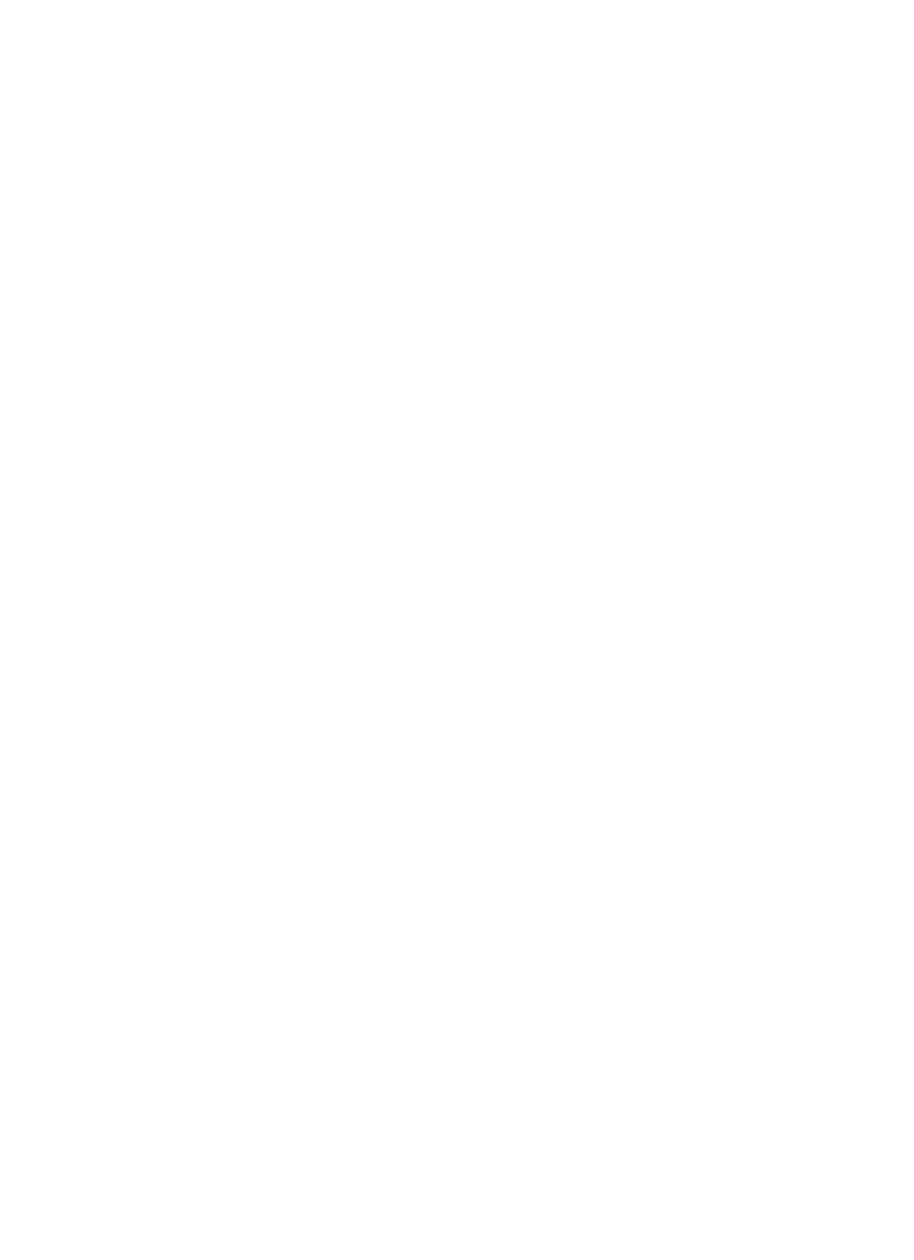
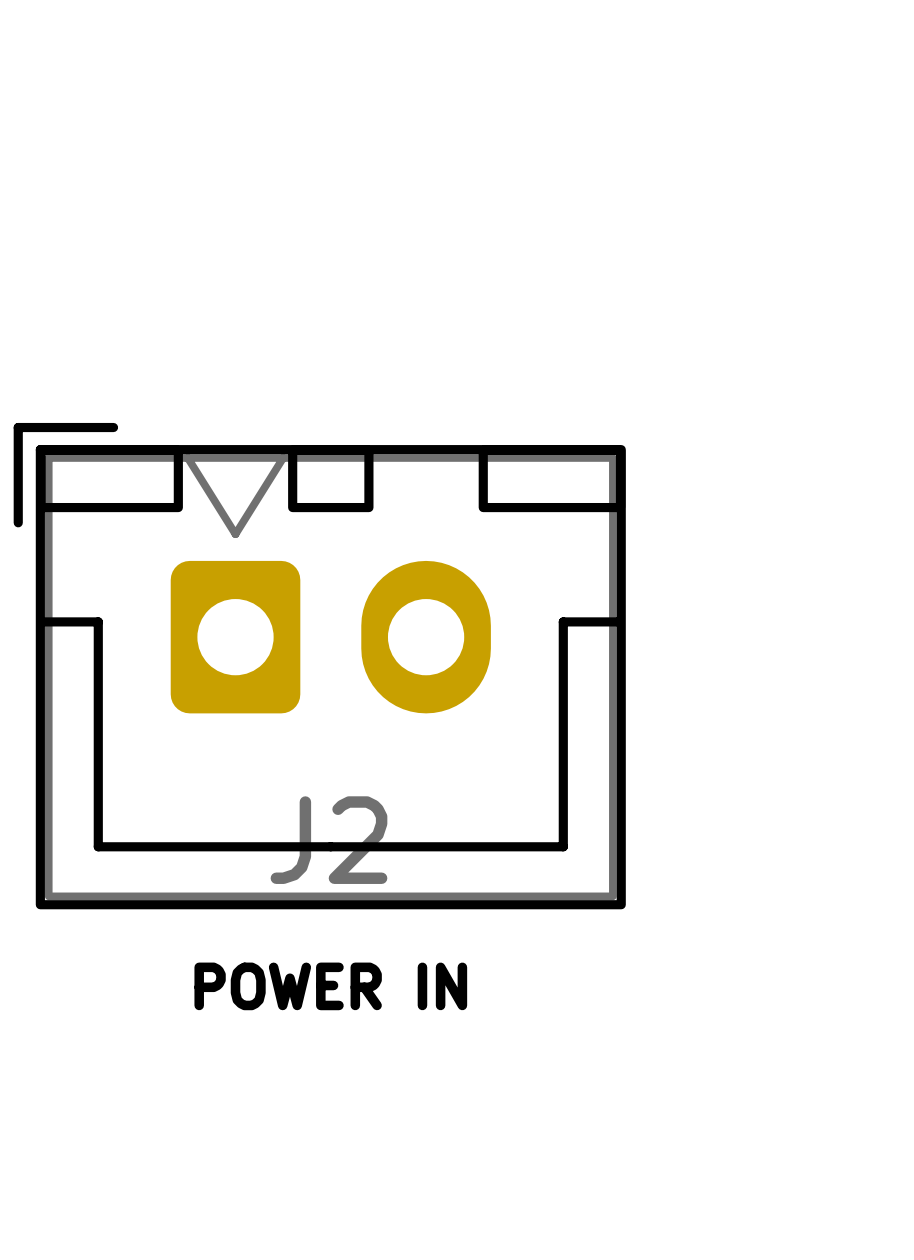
J2: none -> POWER IN (319, 666)

